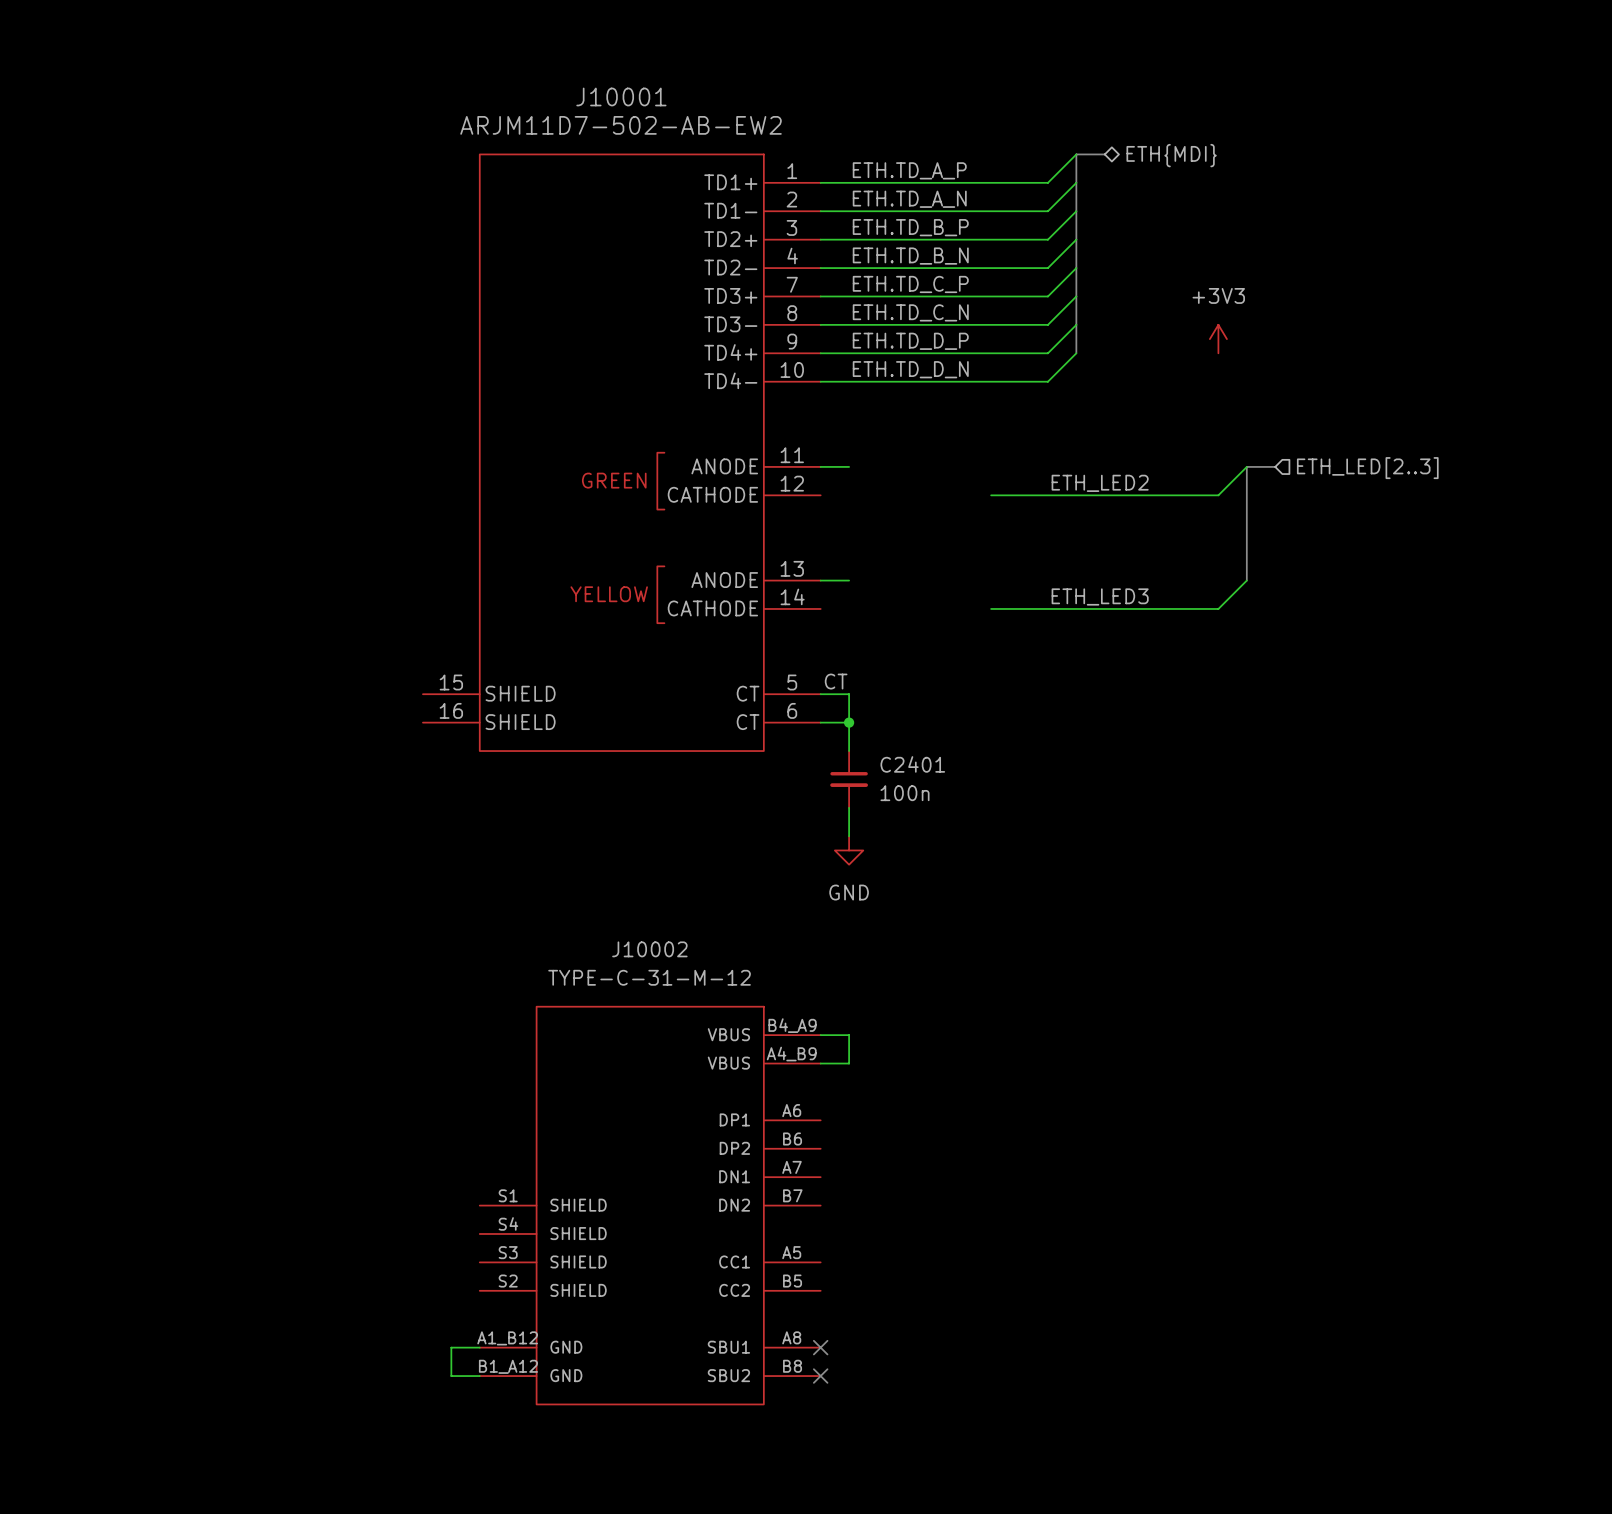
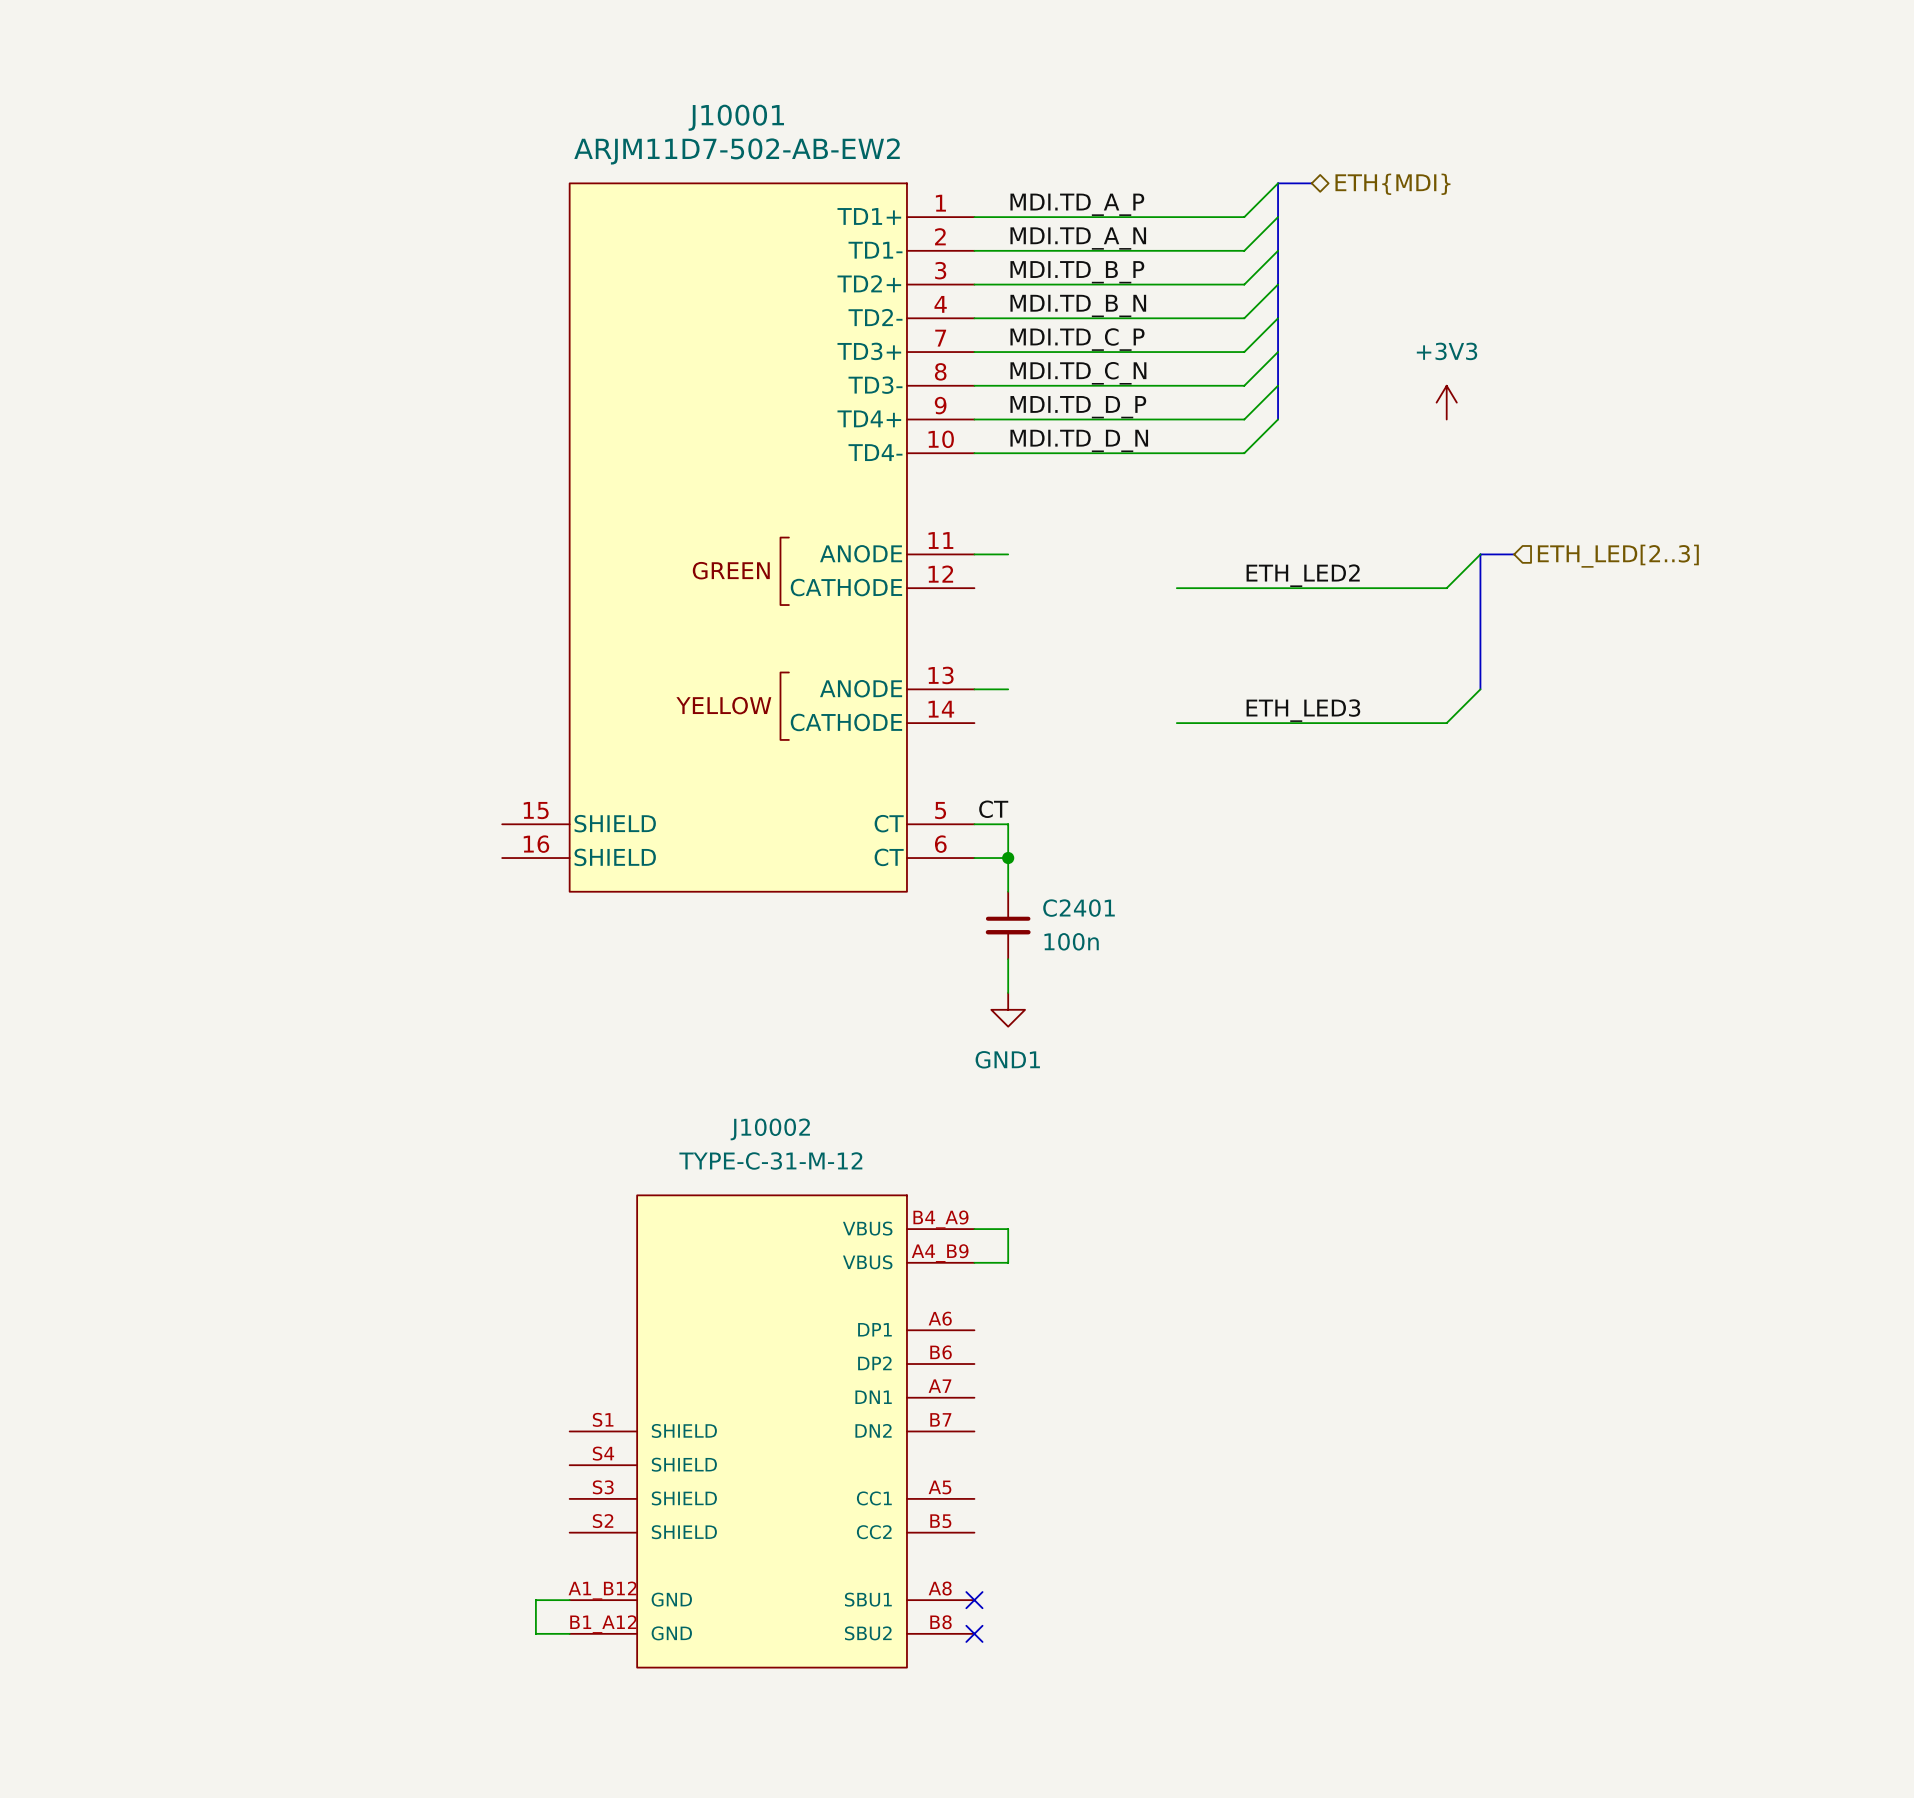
label: ETH.TD_A_P (909, 170) -> MDI.TD_A_P (1077, 204)
label: ETH.TD_A_N (909, 199) -> MDI.TD_A_N (1078, 238)
label: ETH.TD_B_P (910, 227) -> MDI.TD_B_P (1077, 272)
label: ETH.TD_B_N (910, 256) -> MDI.TD_B_N (1078, 305)
label: ETH.TD_C_P (910, 284) -> MDI.TD_C_P (1077, 339)
label: ETH.TD_C_N (910, 312) -> MDI.TD_C_N (1078, 373)
label: ETH.TD_D_P (910, 341) -> MDI.TD_D_P (1078, 407)
label: ETH.TD_D_N (910, 369) -> MDI.TD_D_N (1079, 440)
power symbol: GND (849, 850) -> GND1 (1008, 1009)

